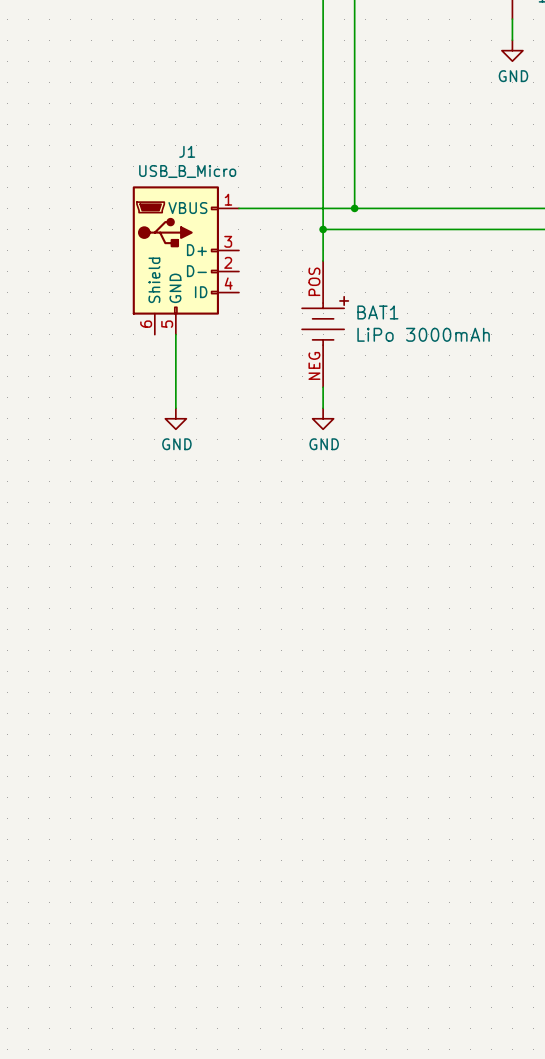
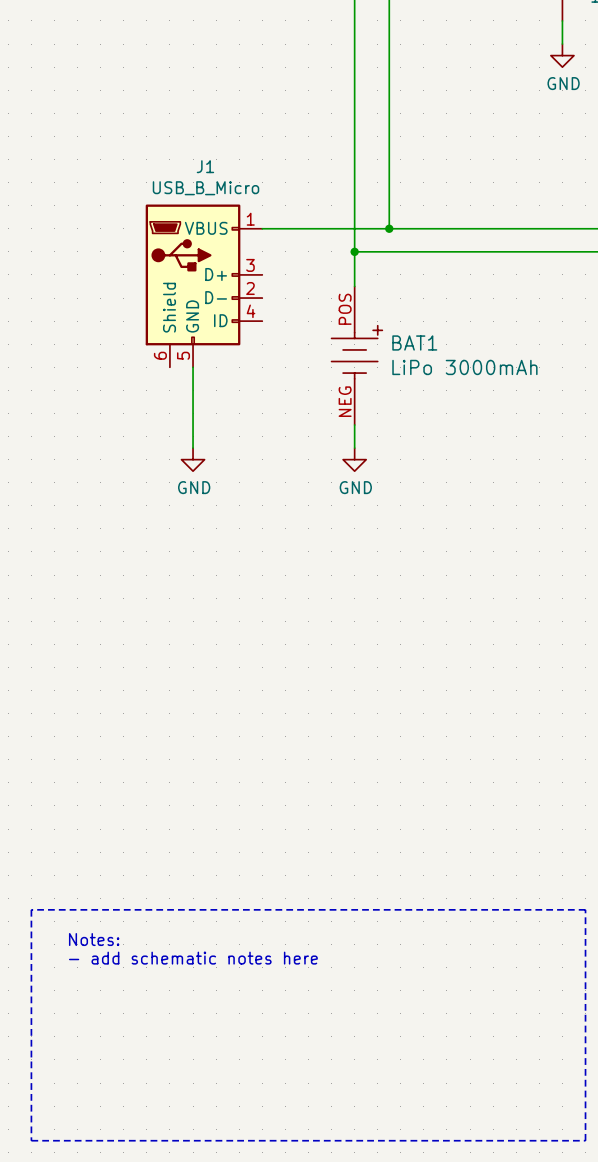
line: none -> (31, 909) (31, 1140) (585, 1140) (585, 909) (31, 909)
text: none -> Notes: (94, 939)
text: none -> - add schematic notes here (193, 958)

